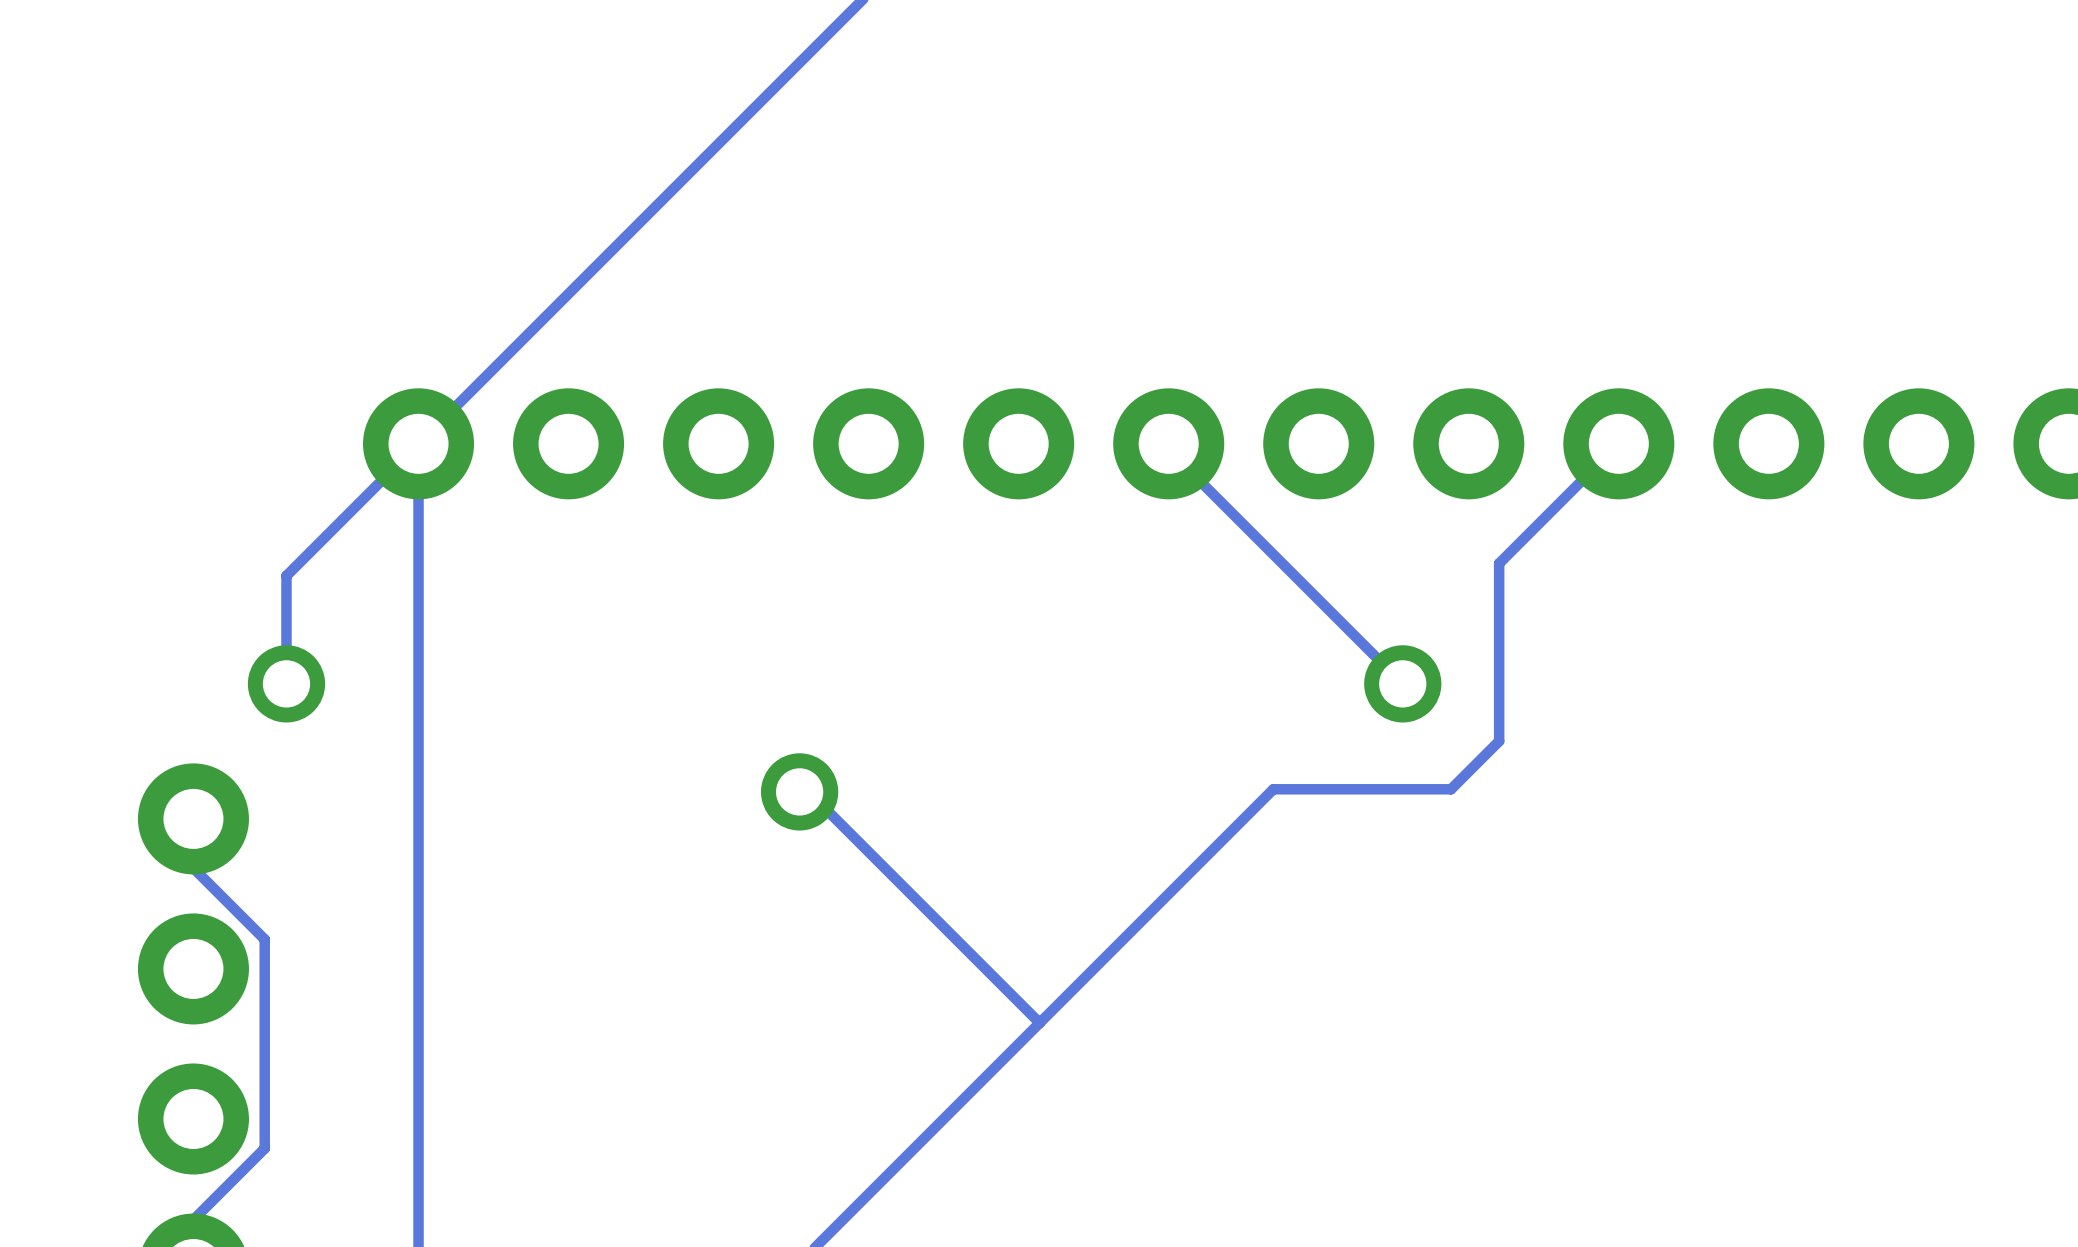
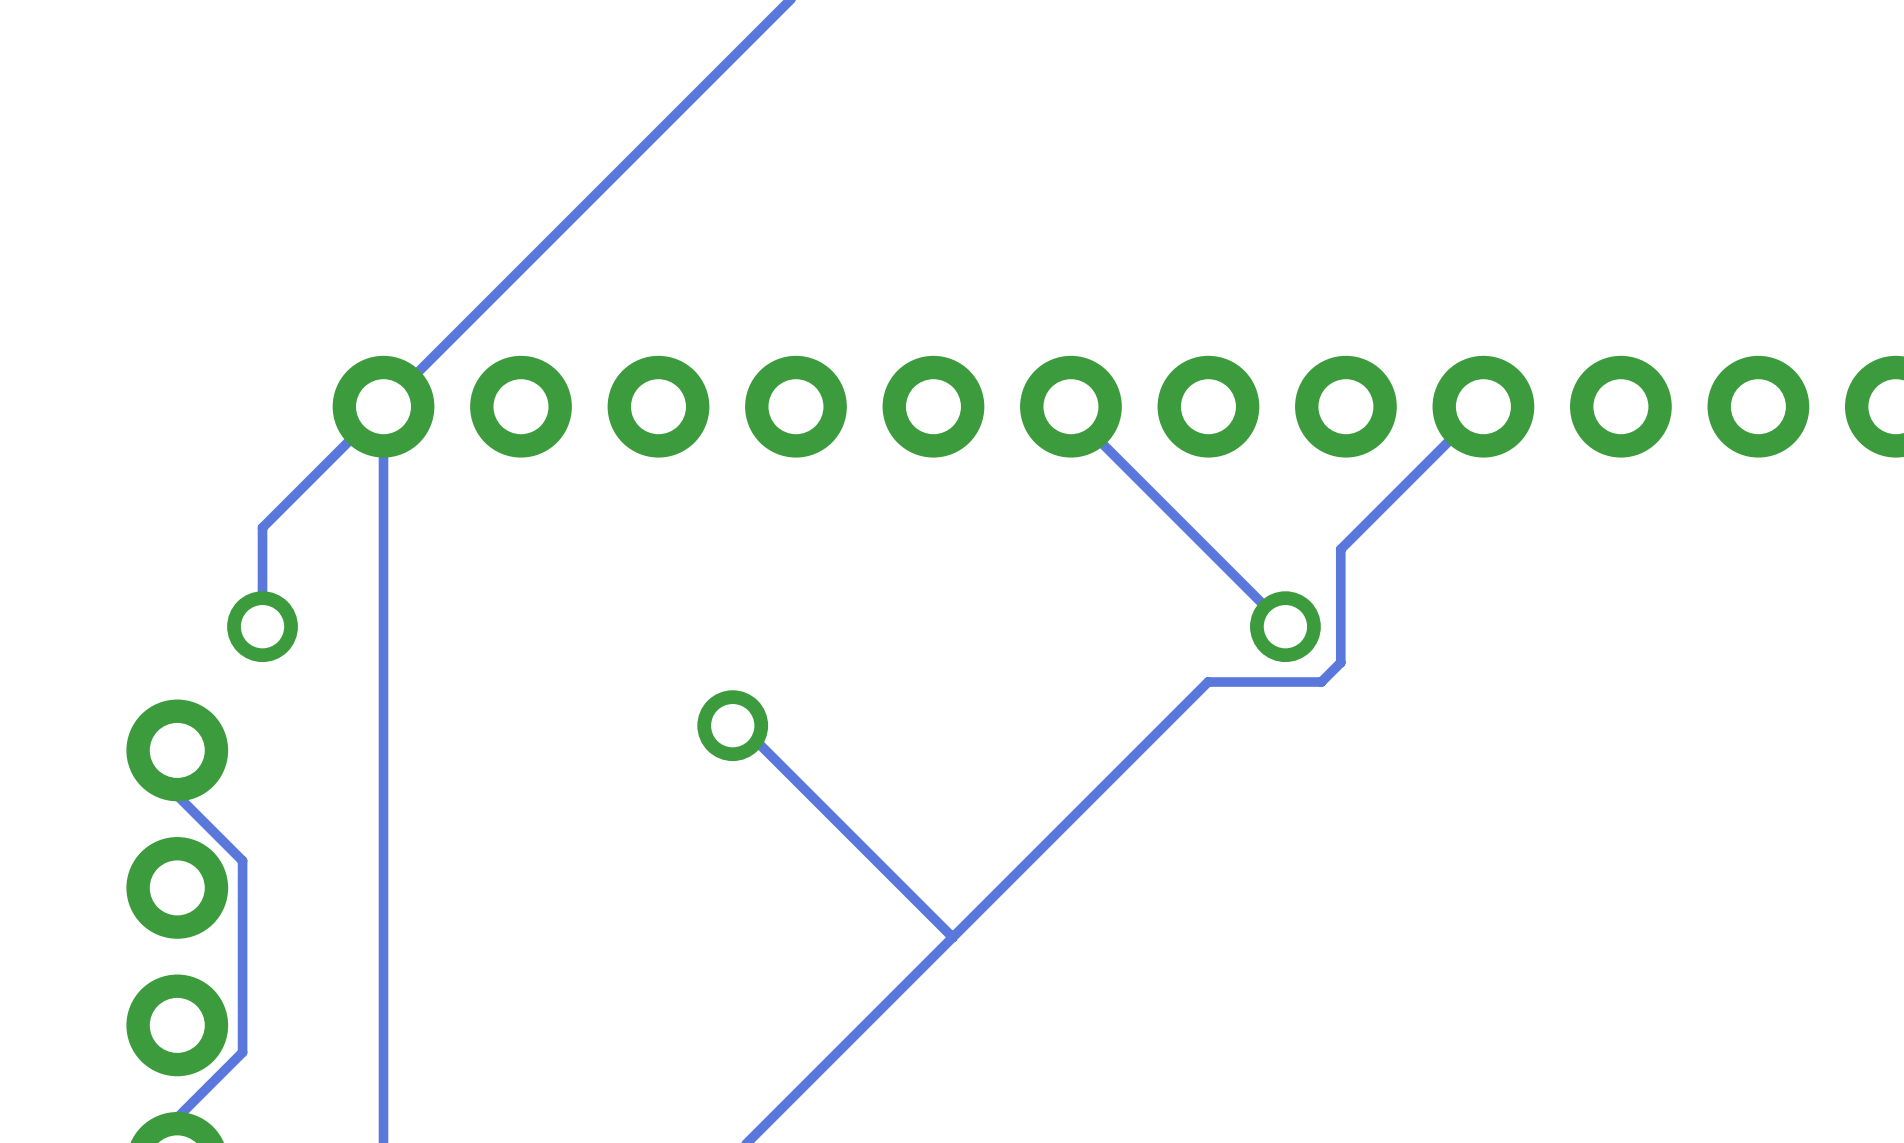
track: (1499, 563) (1499, 741) (1451, 789) (1273, 789) -> (1373, 516) (1340, 549) (1340, 662) (1321, 682) (1208, 682) (1166, 723)

